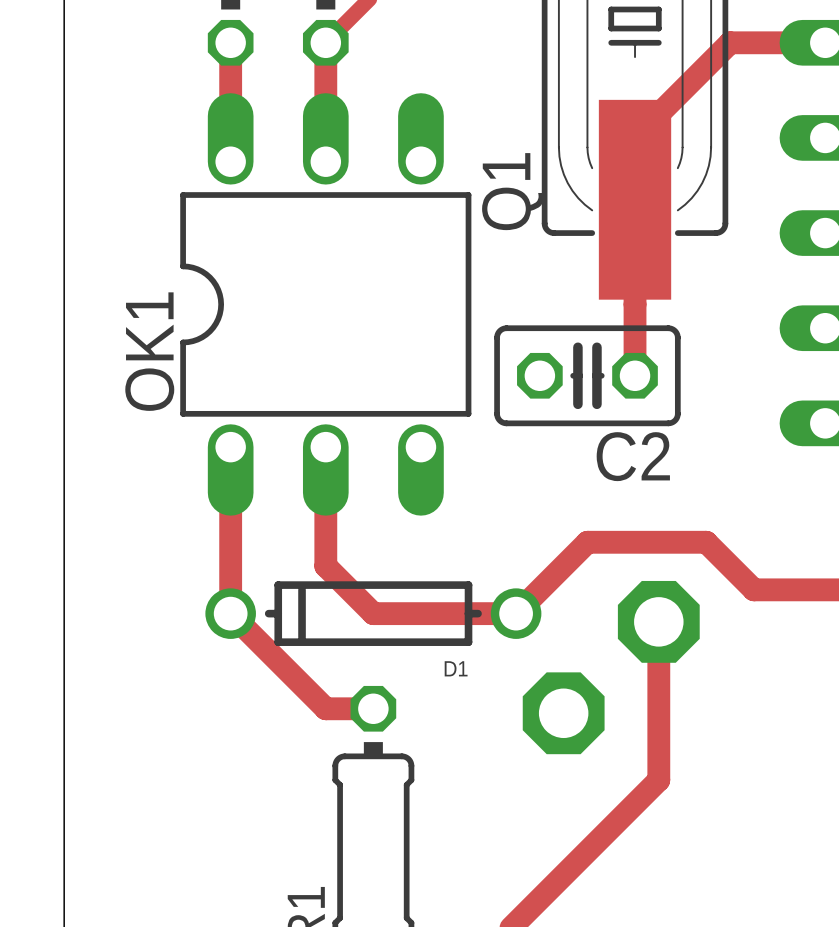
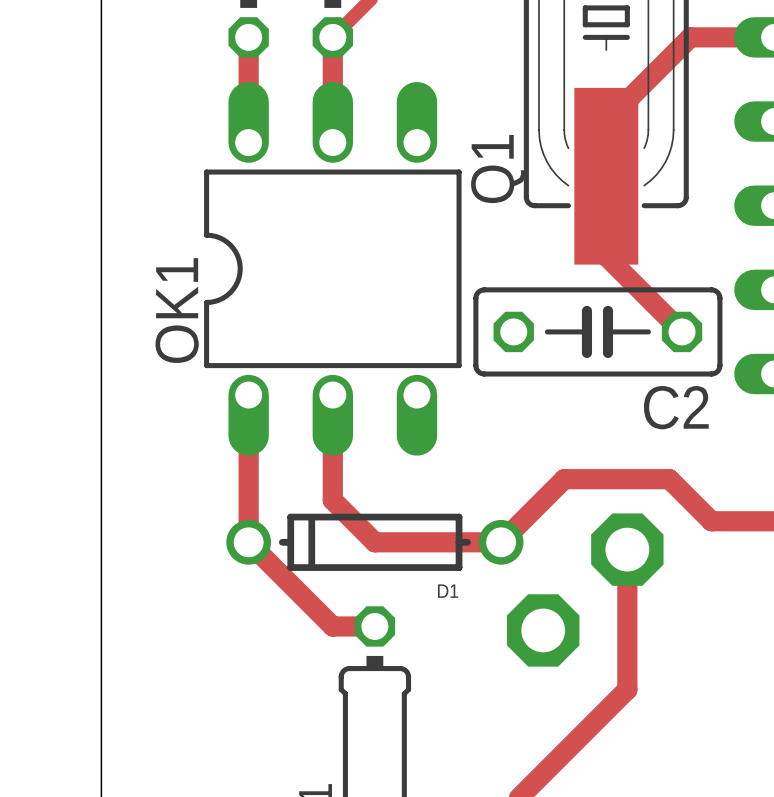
track: (635, 290) (635, 375) -> (606, 256) (682, 331)
C2 footprint: [494, 325, 681, 427] -> [473, 287, 723, 377]

